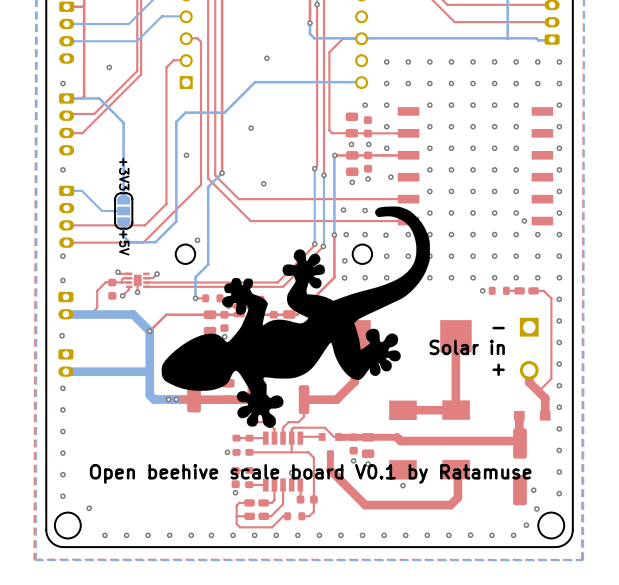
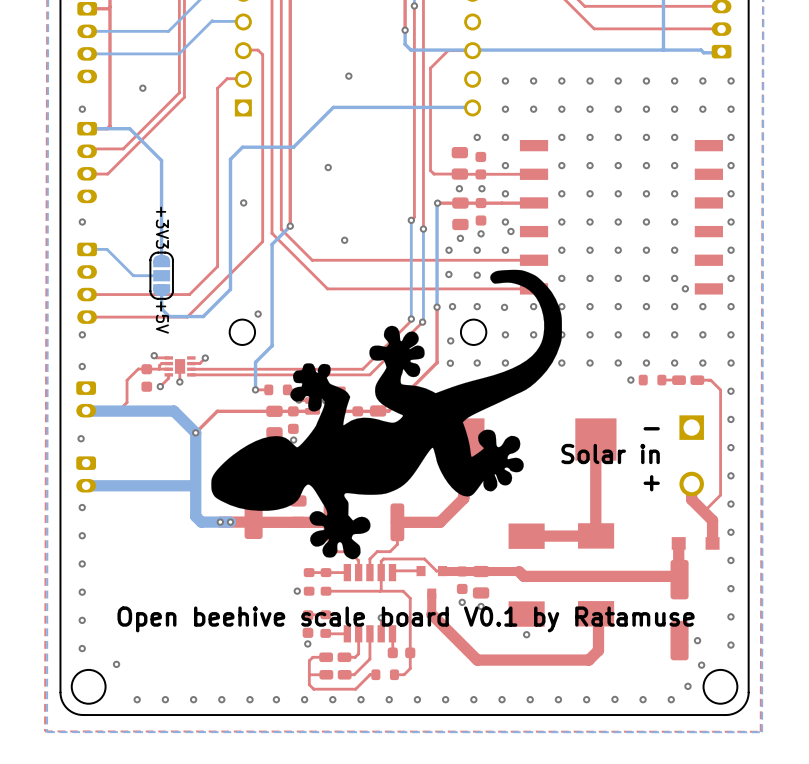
via: none -> (505, 222)
via: none -> (449, 250)
via: none -> (477, 250)
via: none -> (505, 250)

